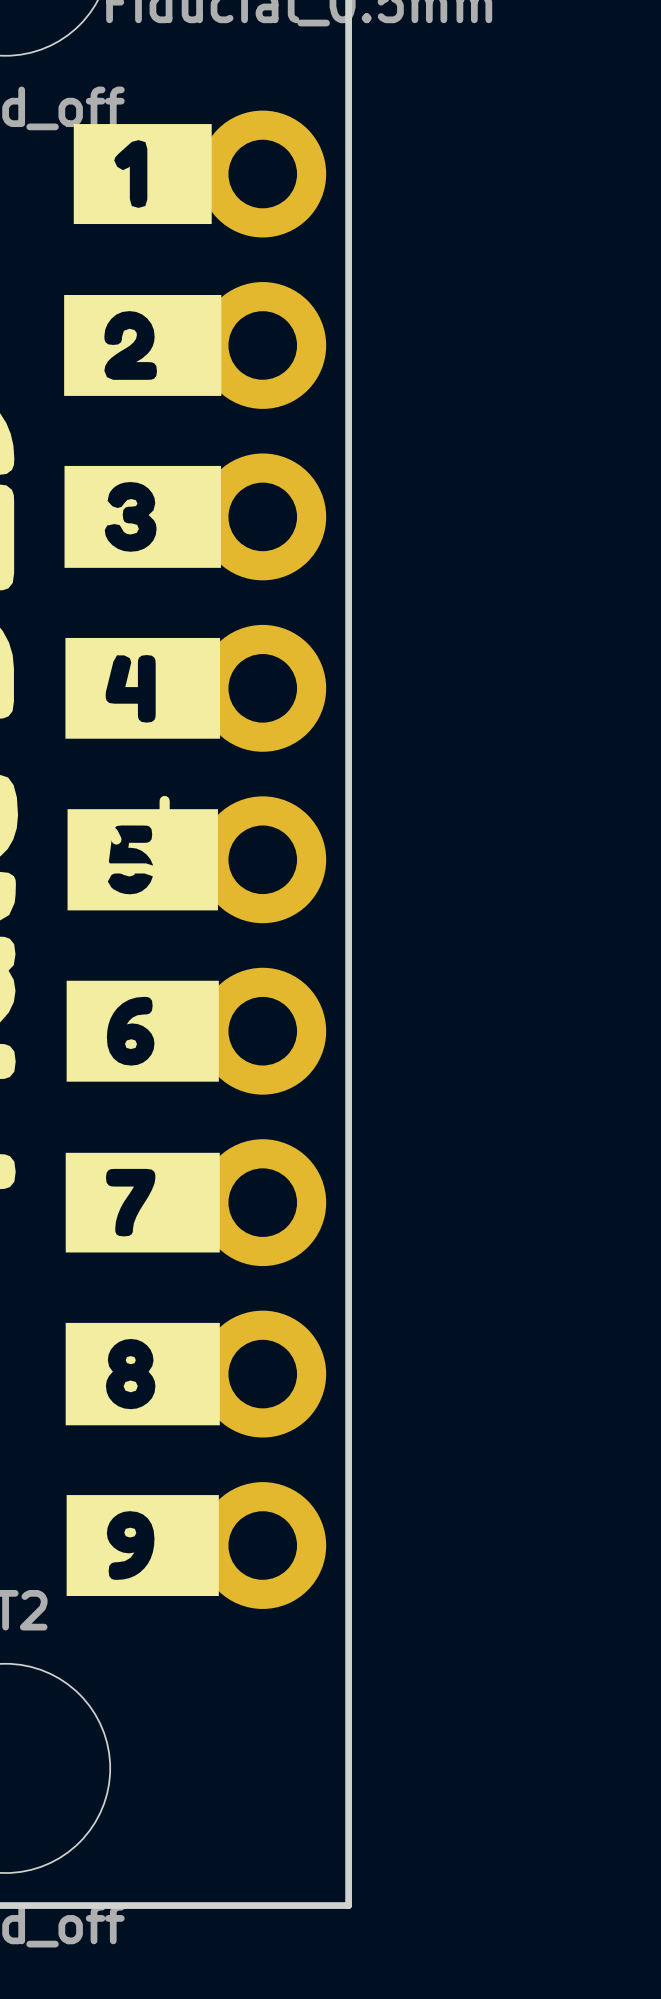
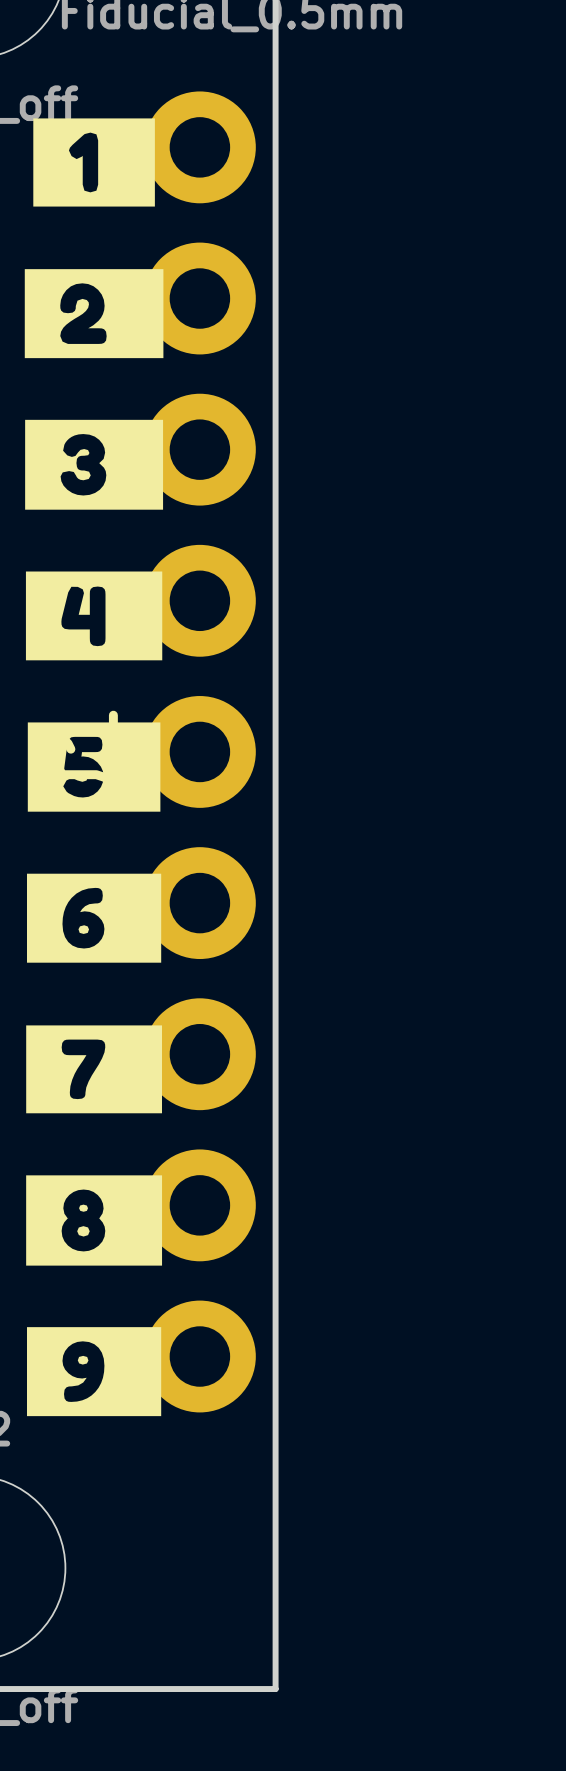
part position: (262, 859) -> (199, 751)

